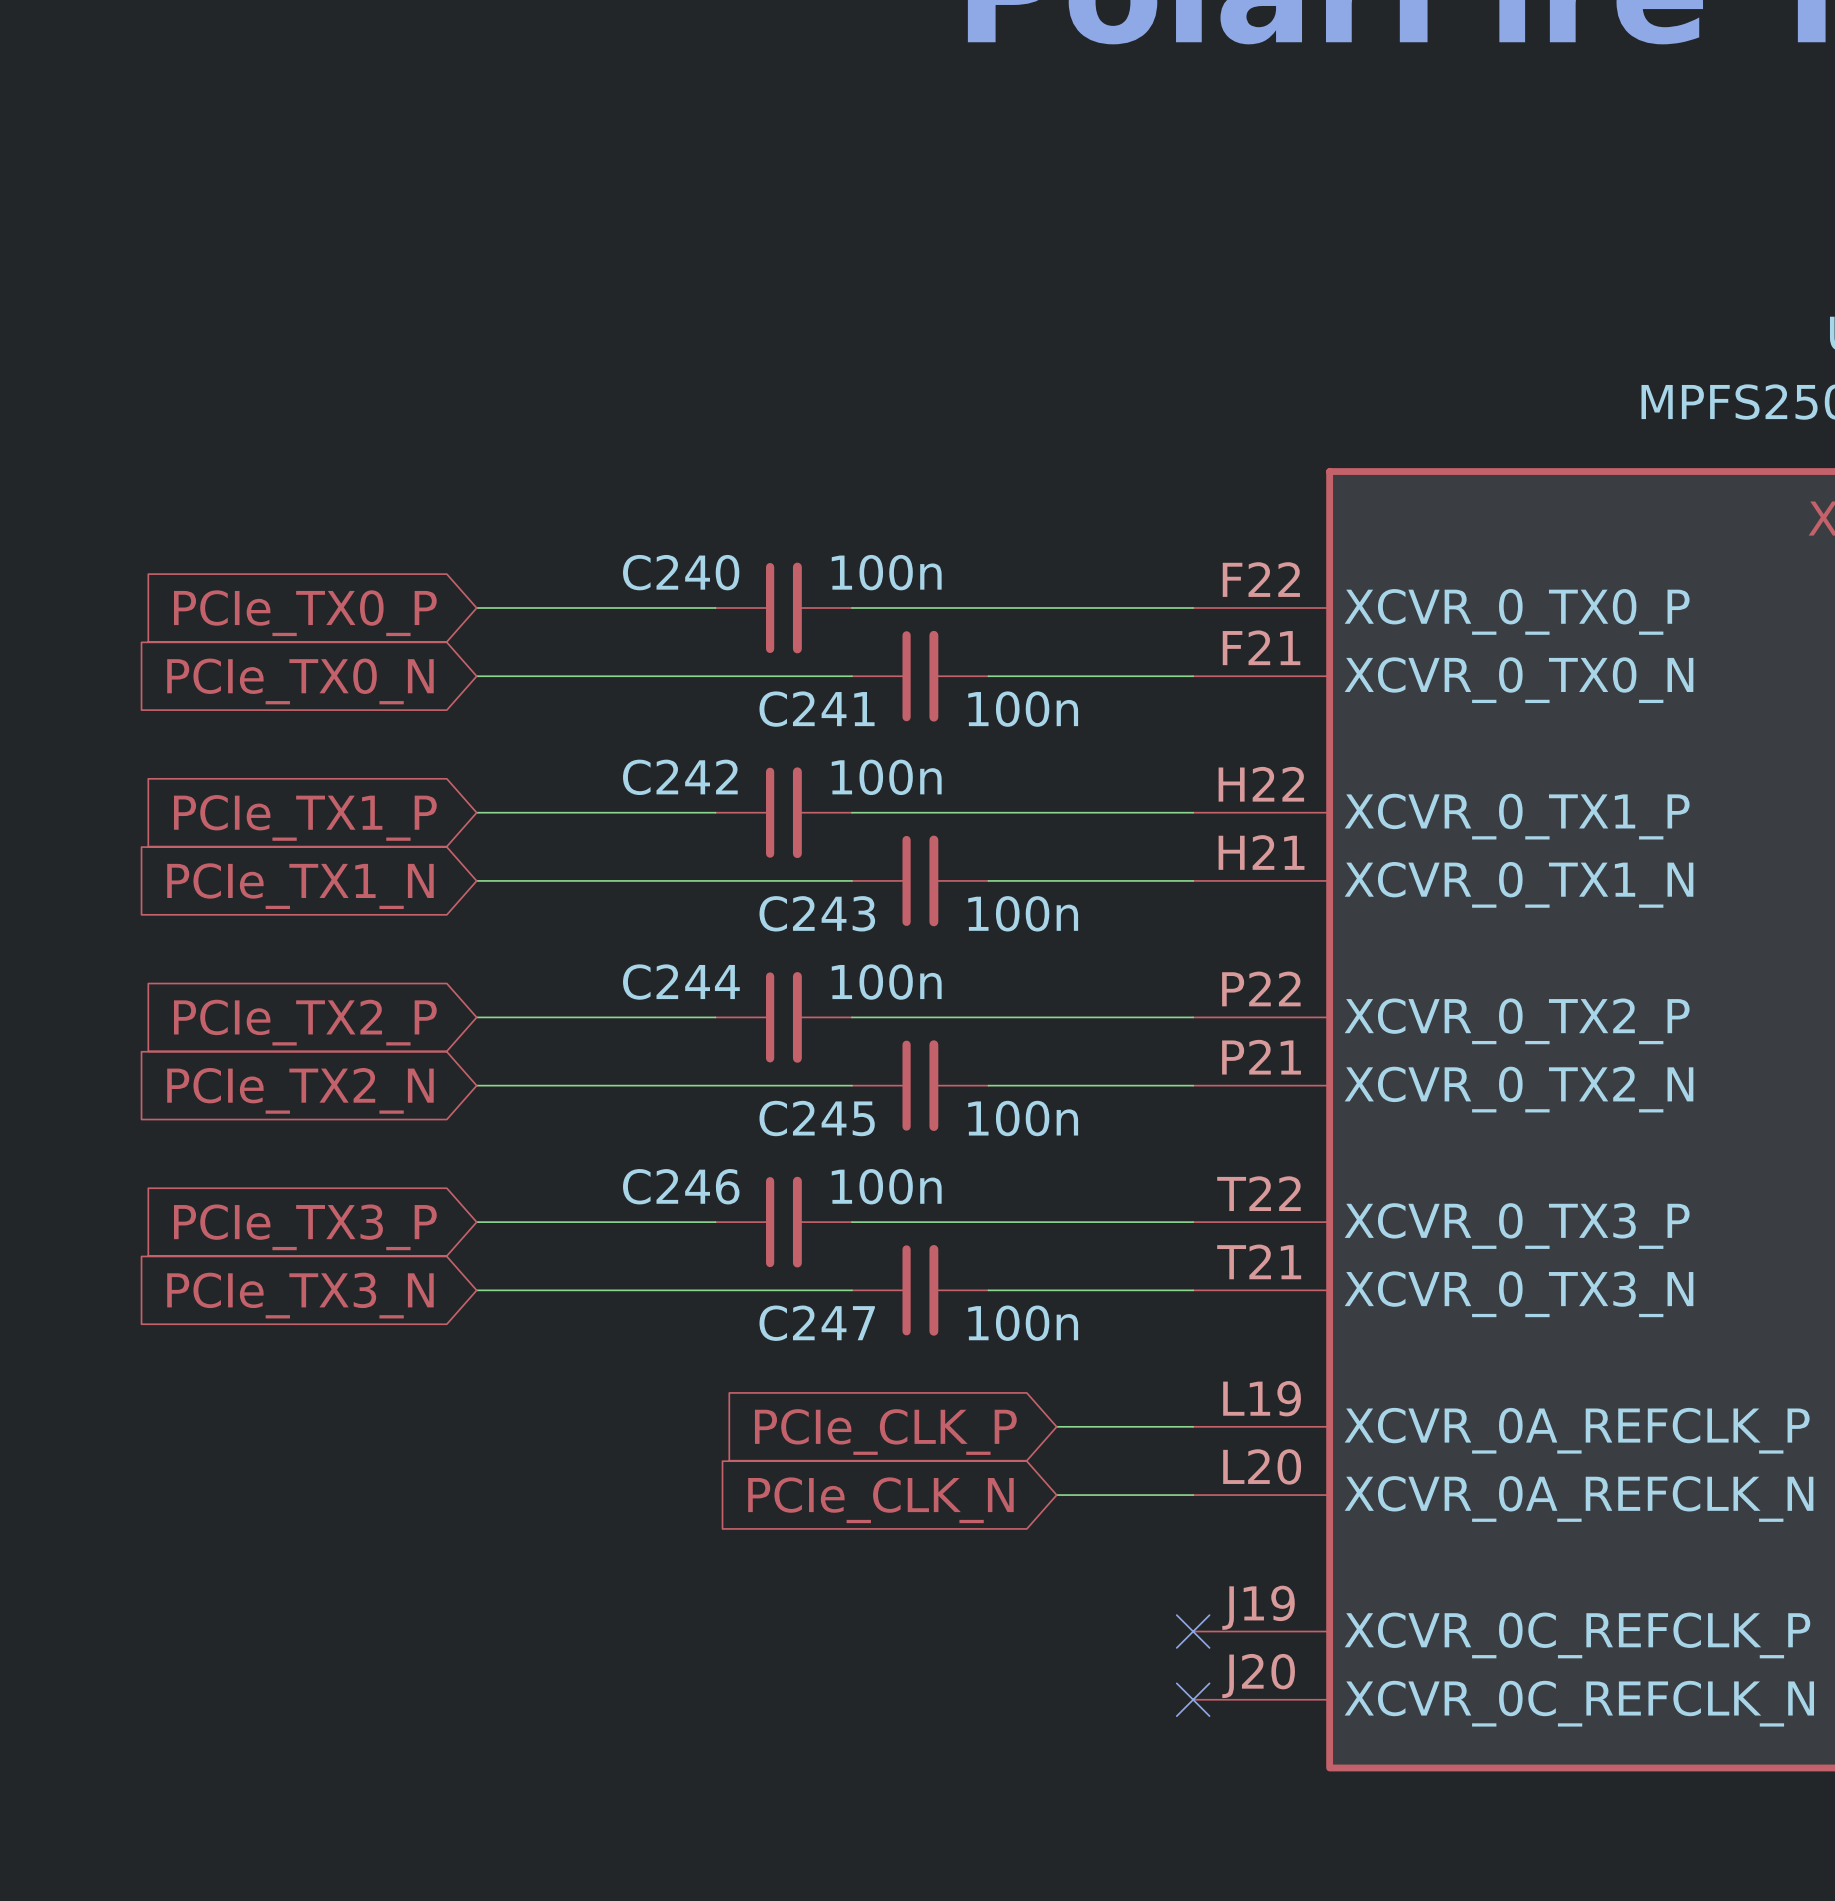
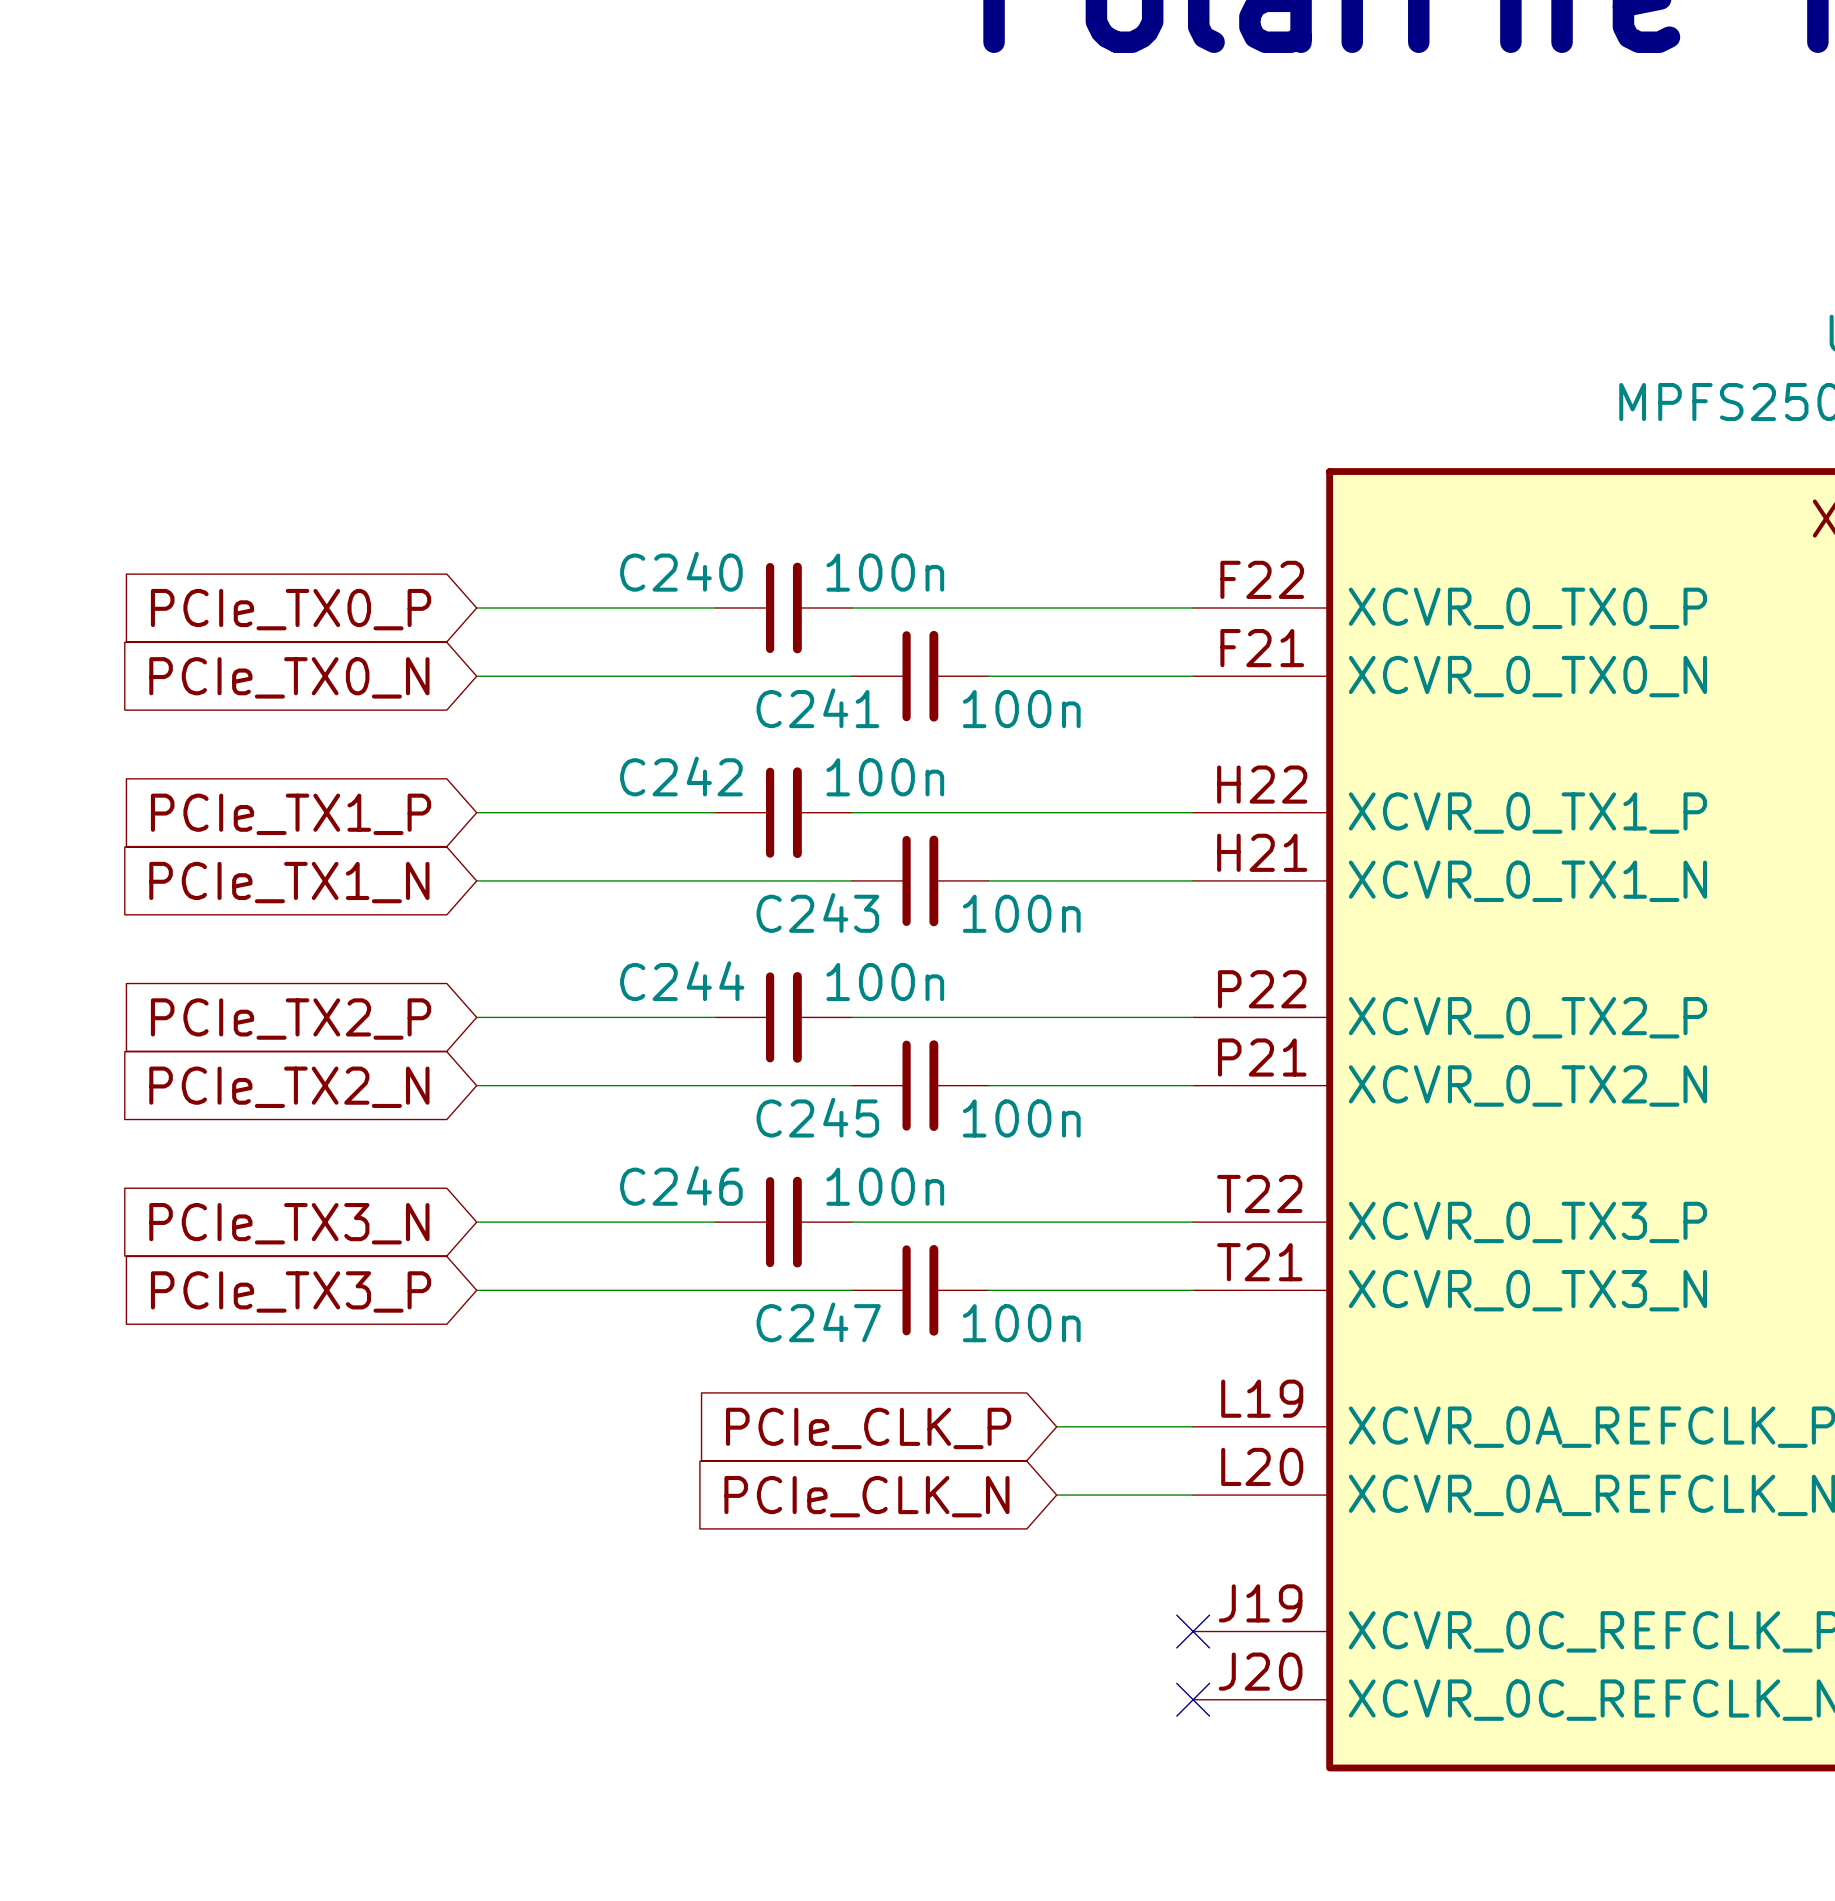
global label: PCIe_TX3_P (305, 1227) -> PCIe_TX3_N (289, 1223)
global label: PCIe_TX3_N (300, 1295) -> PCIe_TX3_P (291, 1291)

